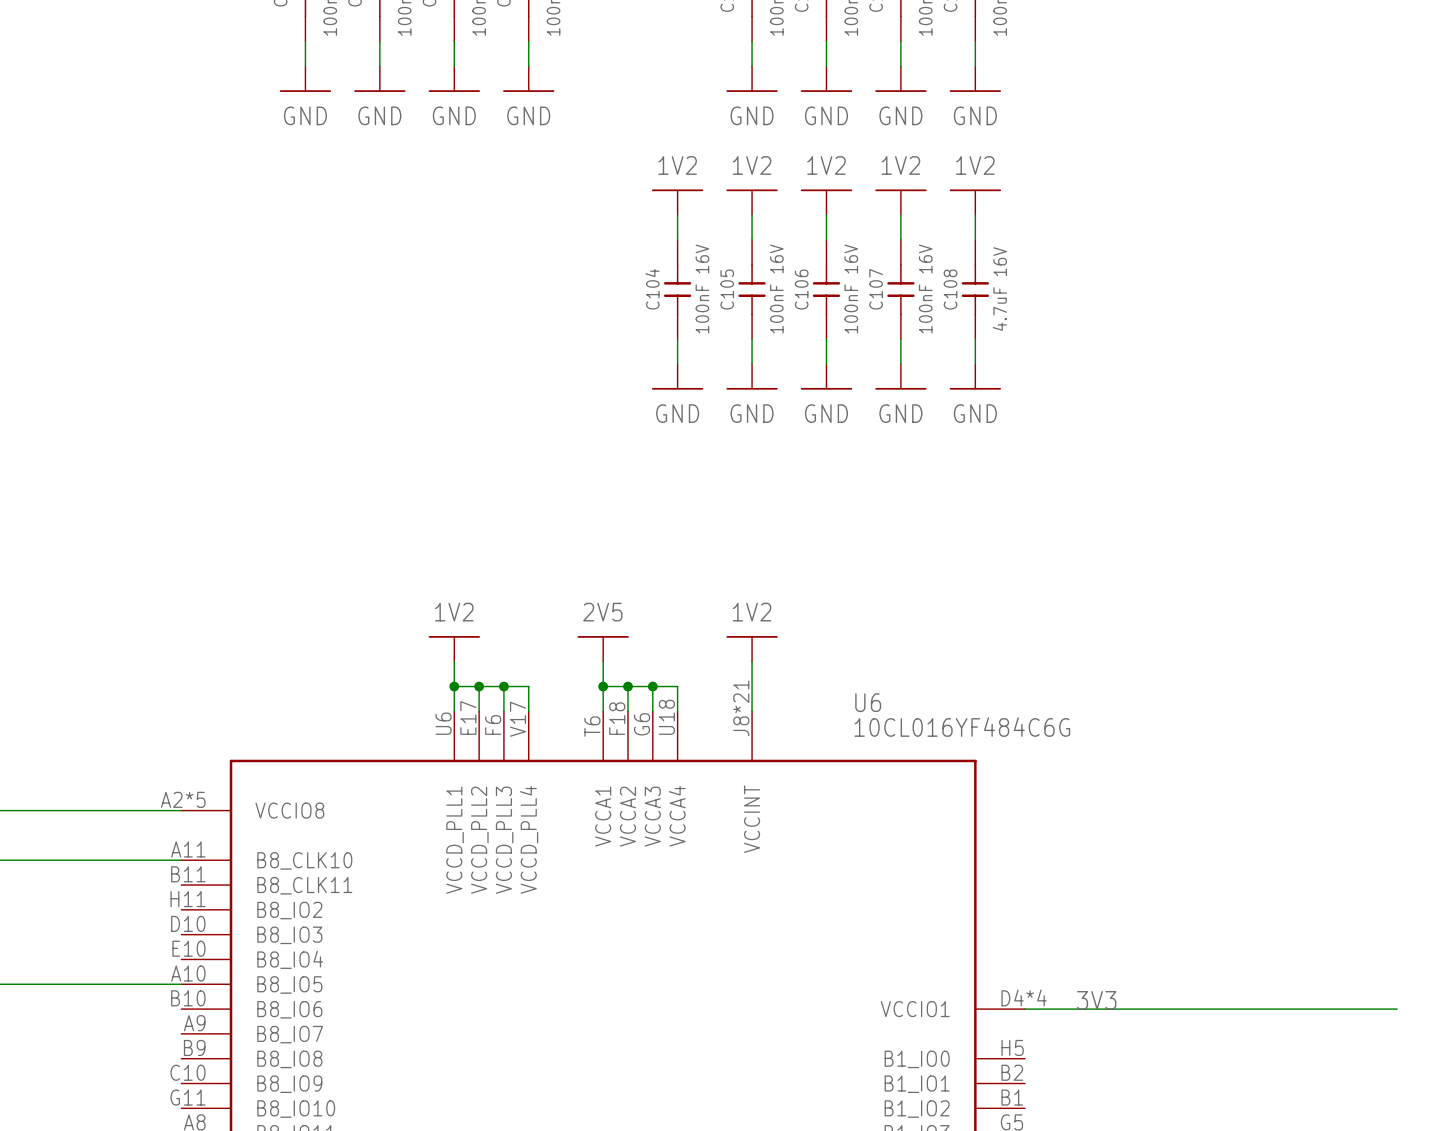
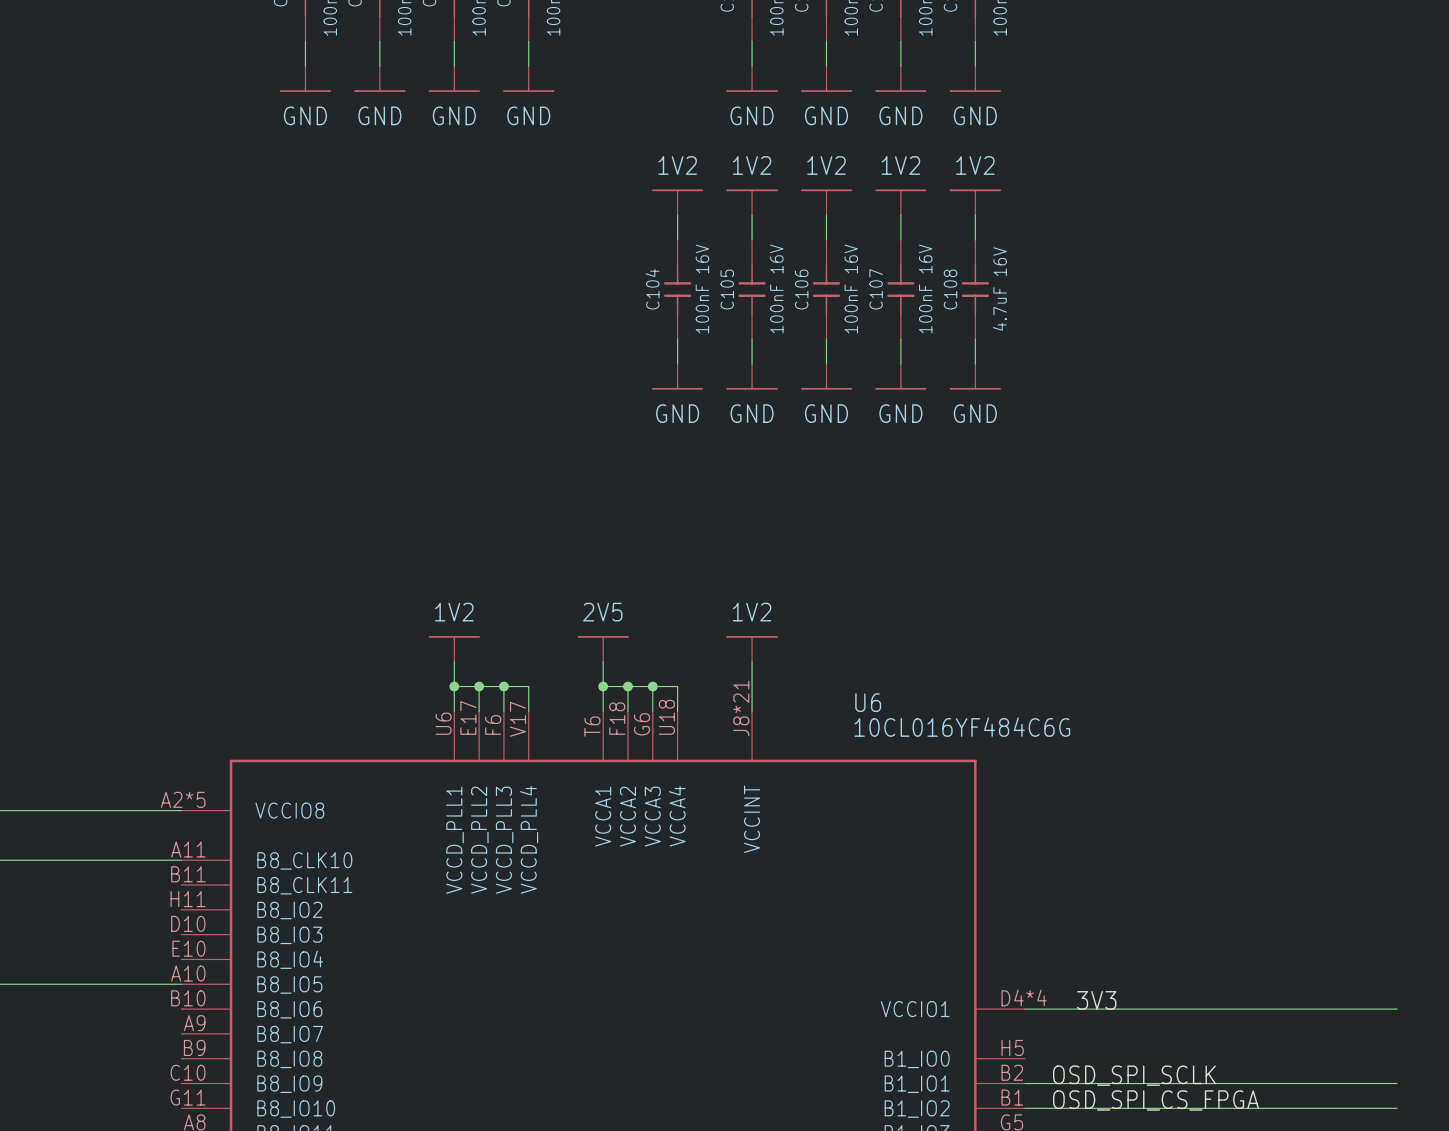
label: none -> OSD_SPI_SCLK (1134, 1075)
wire: none -> (1024, 1083) (1397, 1083)
label: none -> OSD_SPI_CS_FPGA (1156, 1100)
wire: none -> (1024, 1108) (1397, 1108)

